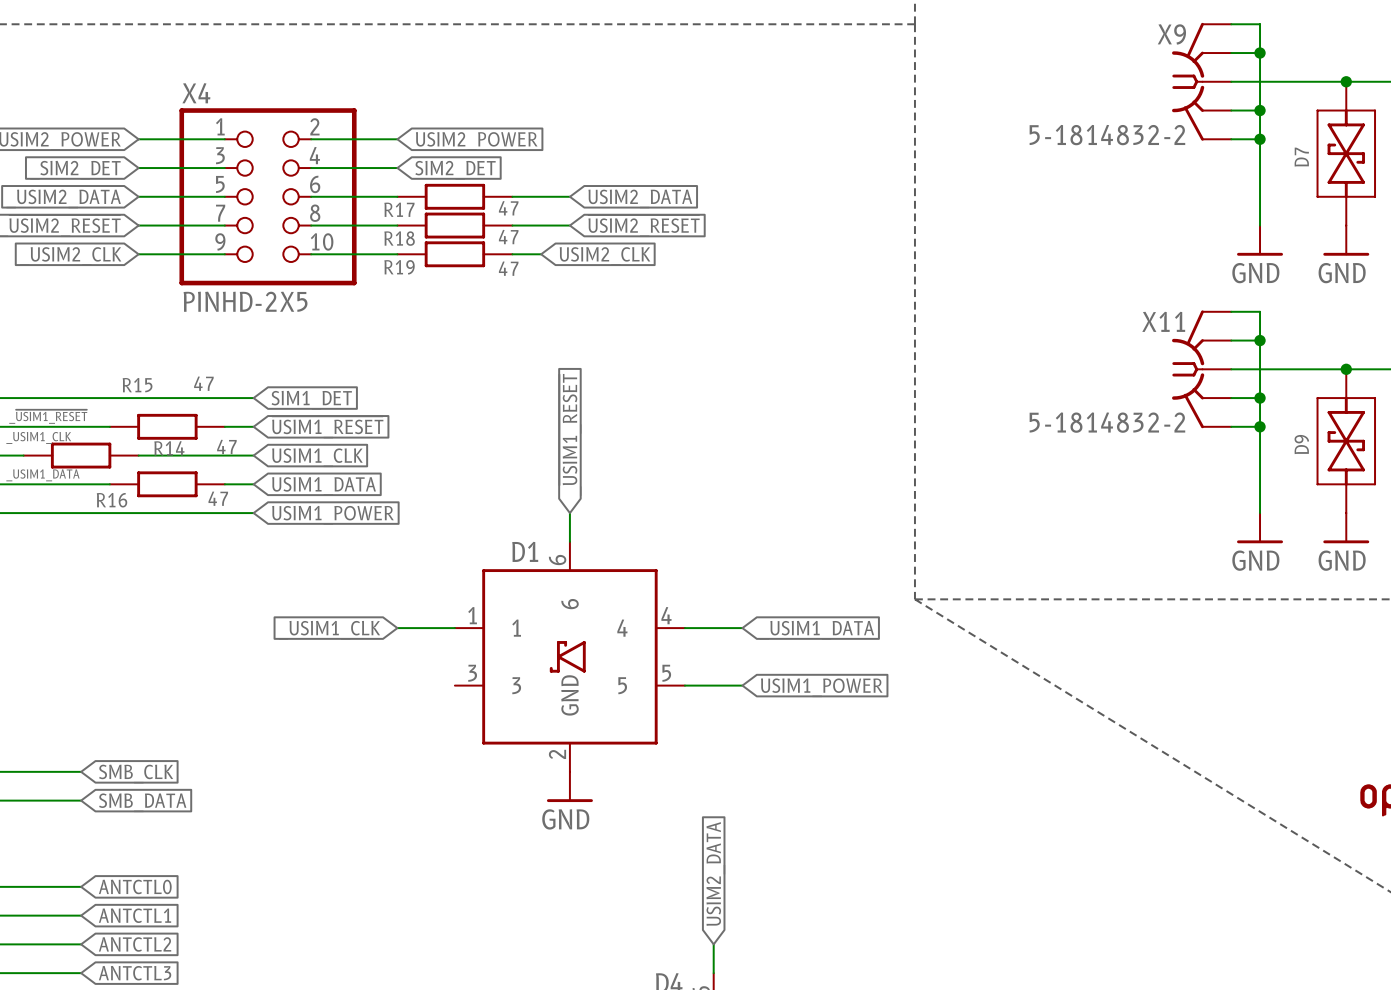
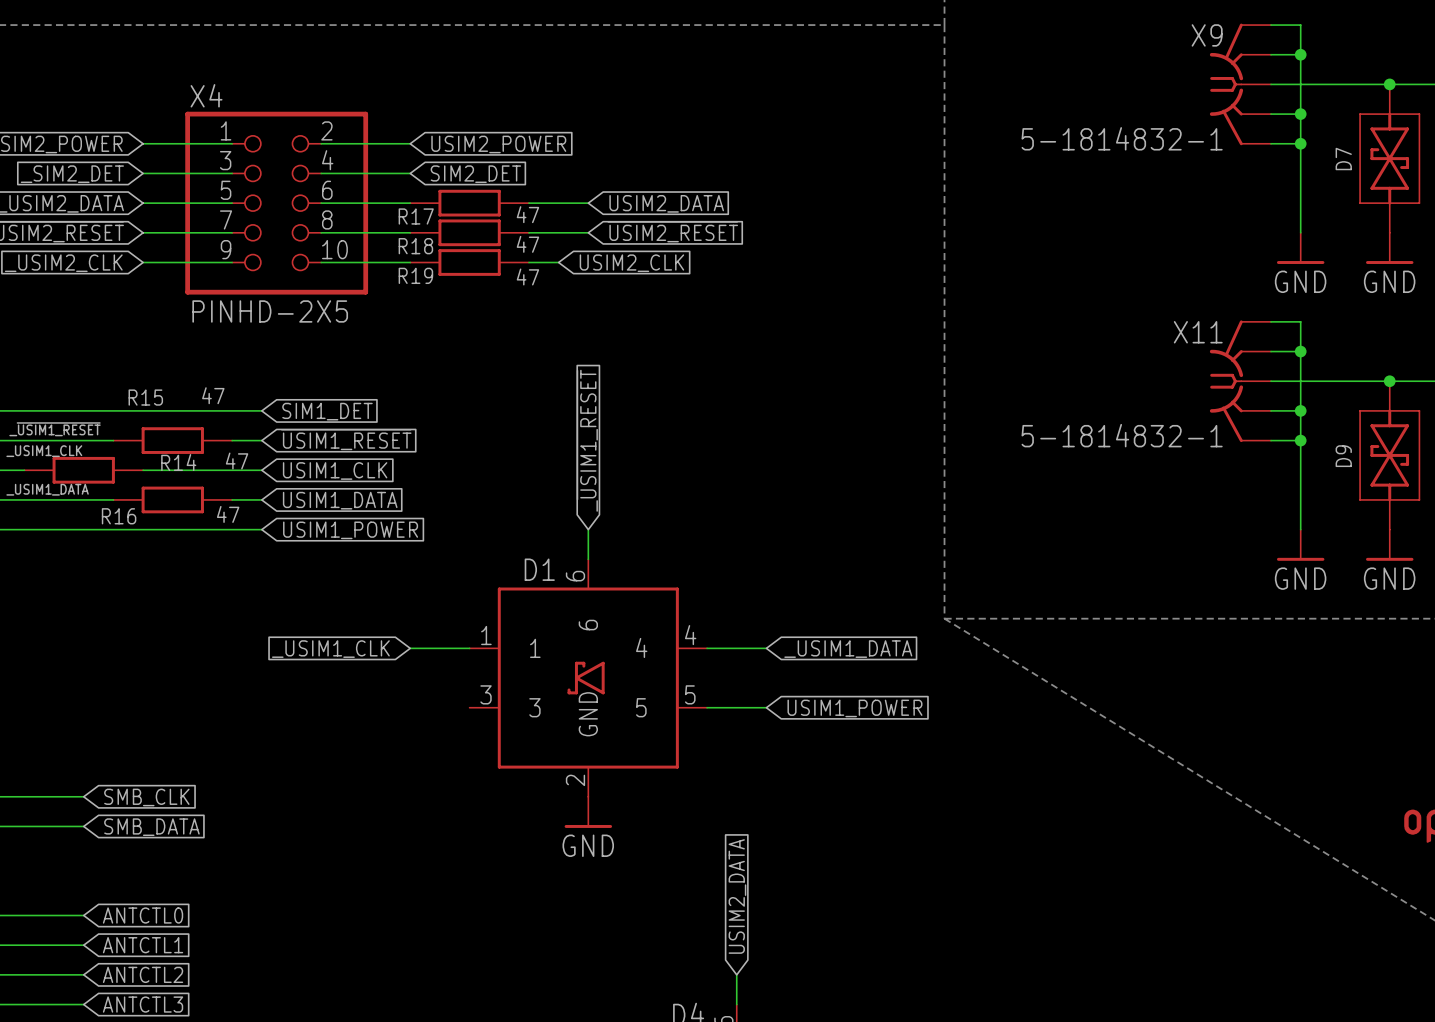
X9 value: 5-1814832-2 (1107, 135) -> 5-1814832-1 (1122, 138)
X11 value: 5-1814832-2 (1107, 422) -> 5-1814832-1 (1122, 435)

